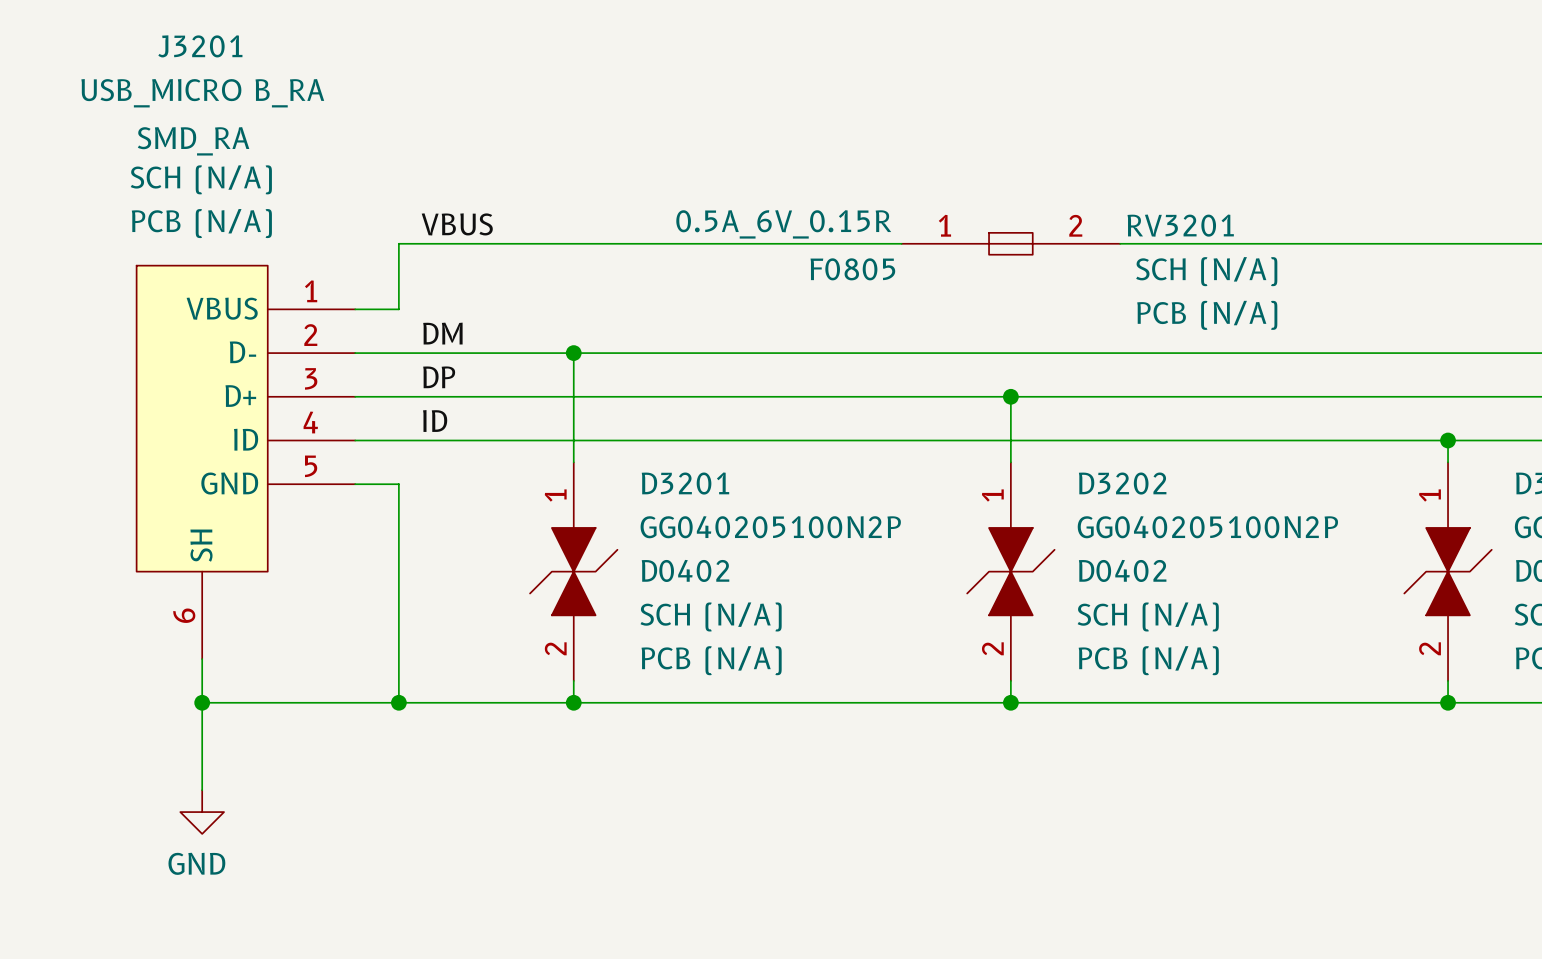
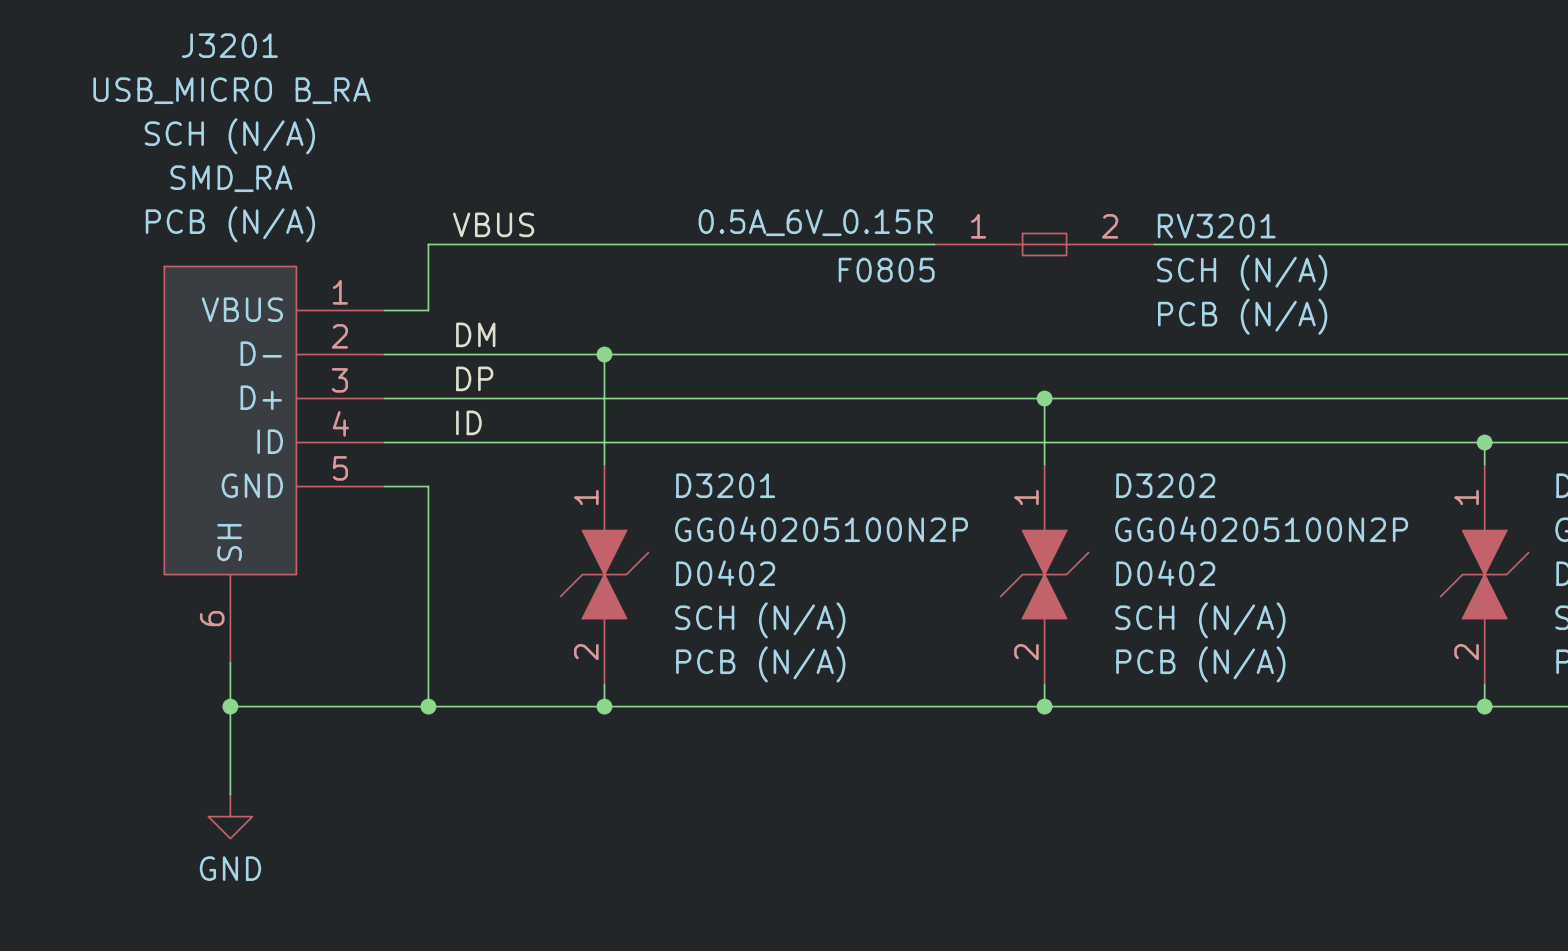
J3201 text position: SMD_RA (193, 141) -> SMD_RA (231, 178)
J3201 text position: SCH (N/A) (201, 179) -> SCH (N/A) (229, 136)

